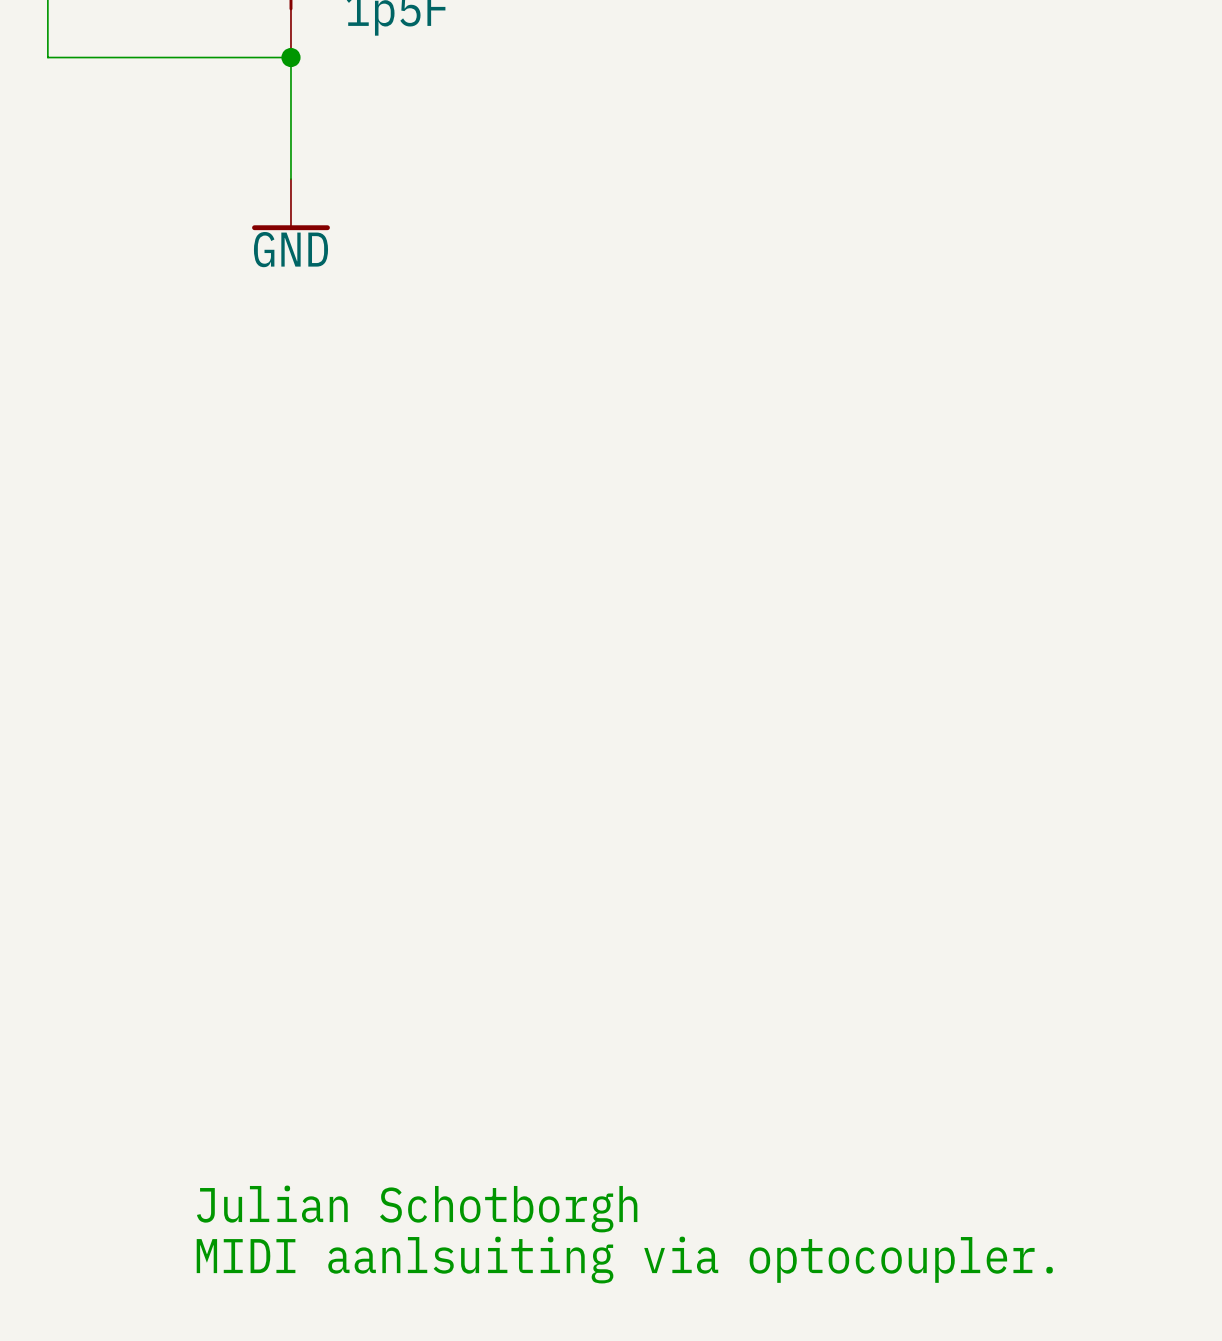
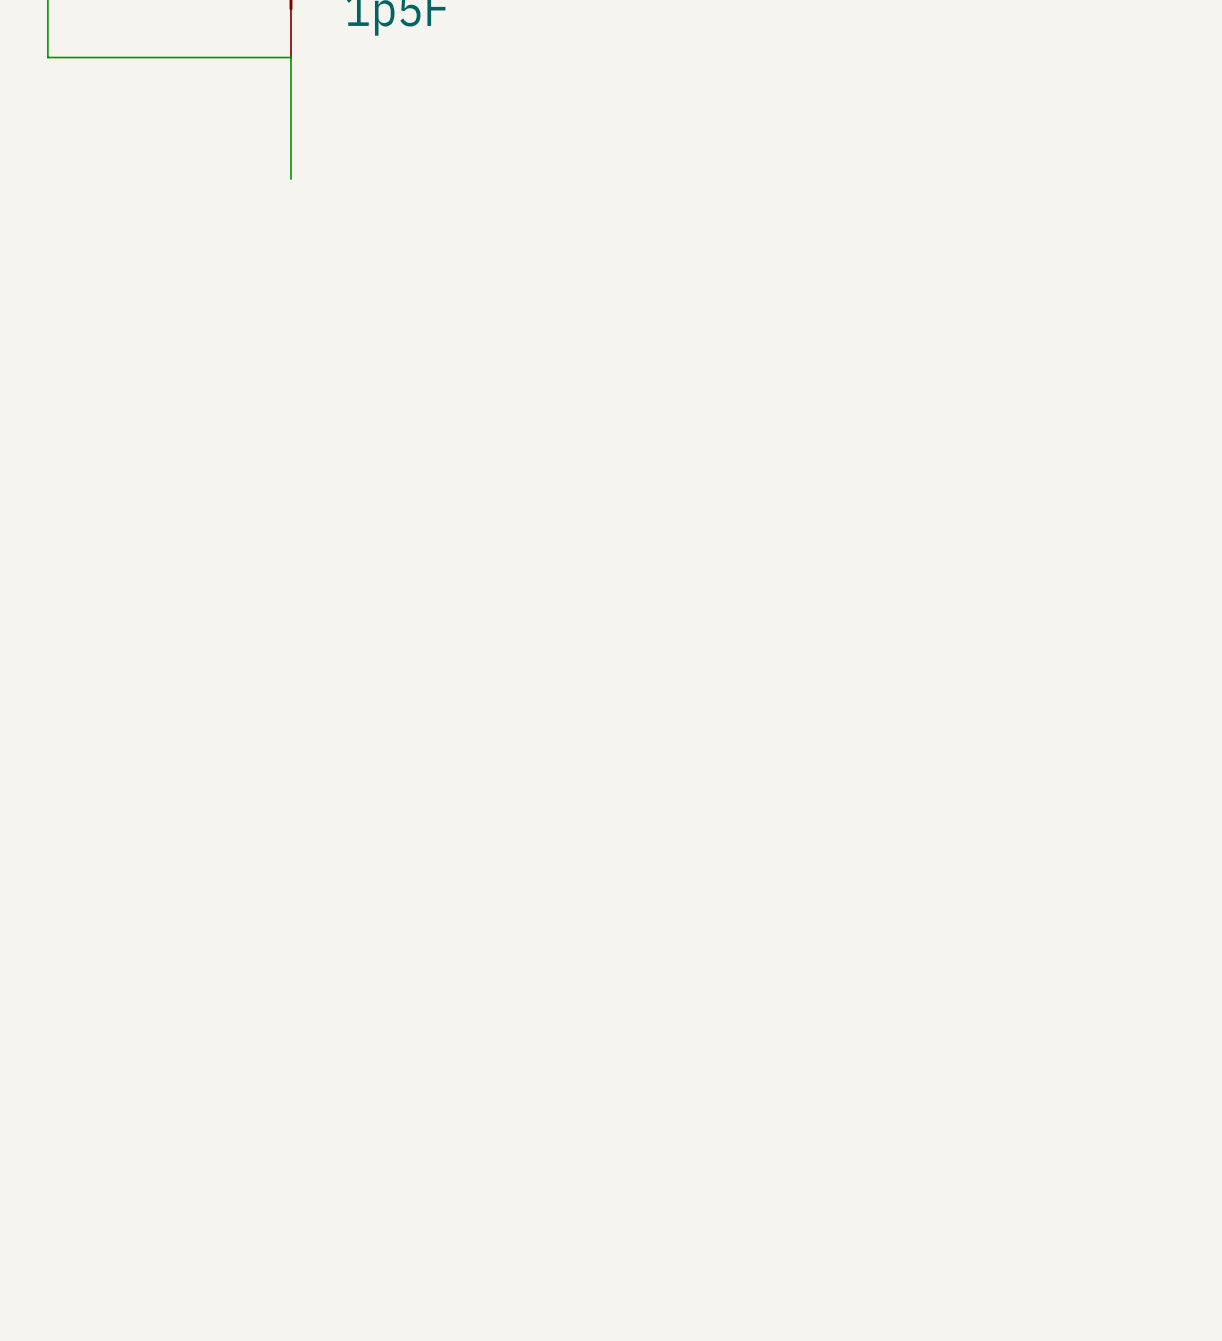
junction: (290, 57) -> none
power symbol: GND (290, 204) -> none
text: Julian Schotborgh (417, 1208) -> none
text: MIDI aanlsuiting via optocoupler. (624, 1260) -> none

